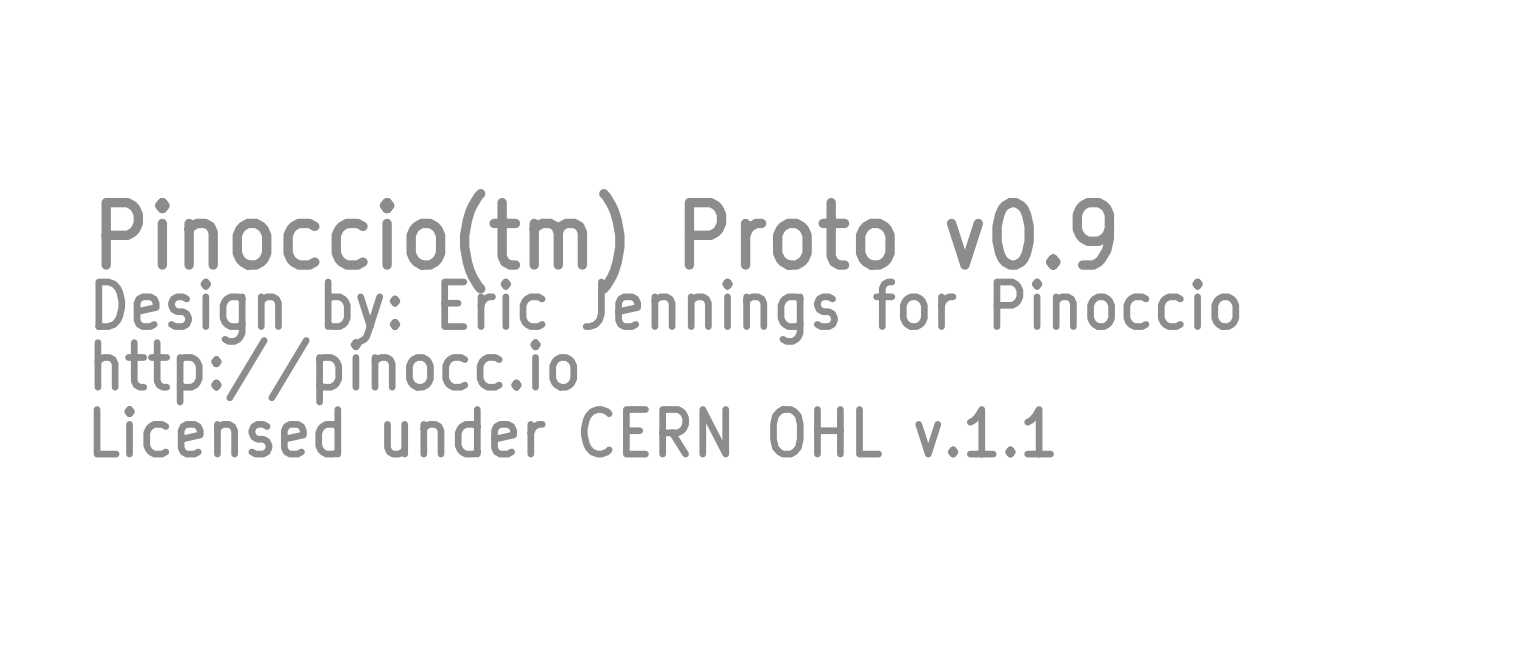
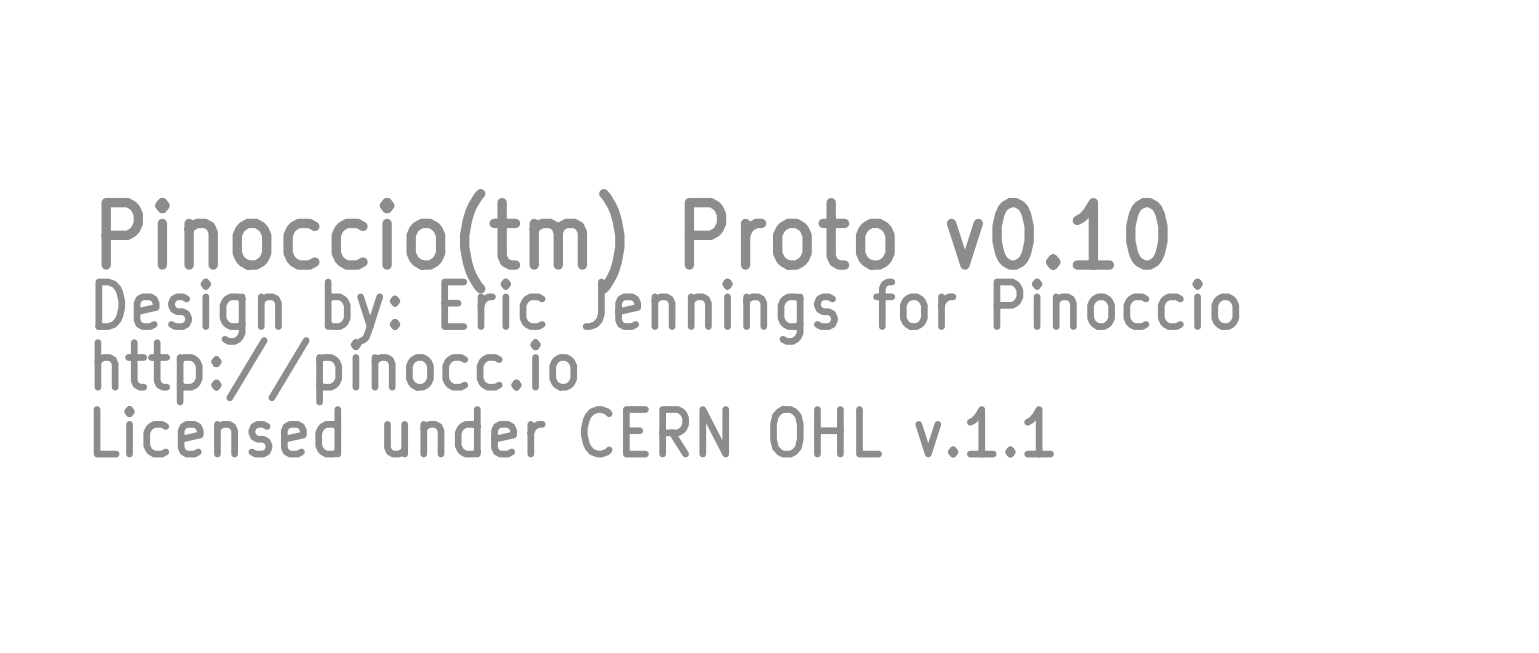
text: Pinoccio(tm) Proto v0.9 (607, 241) -> Pinoccio(tm) Proto v0.10 (634, 241)

